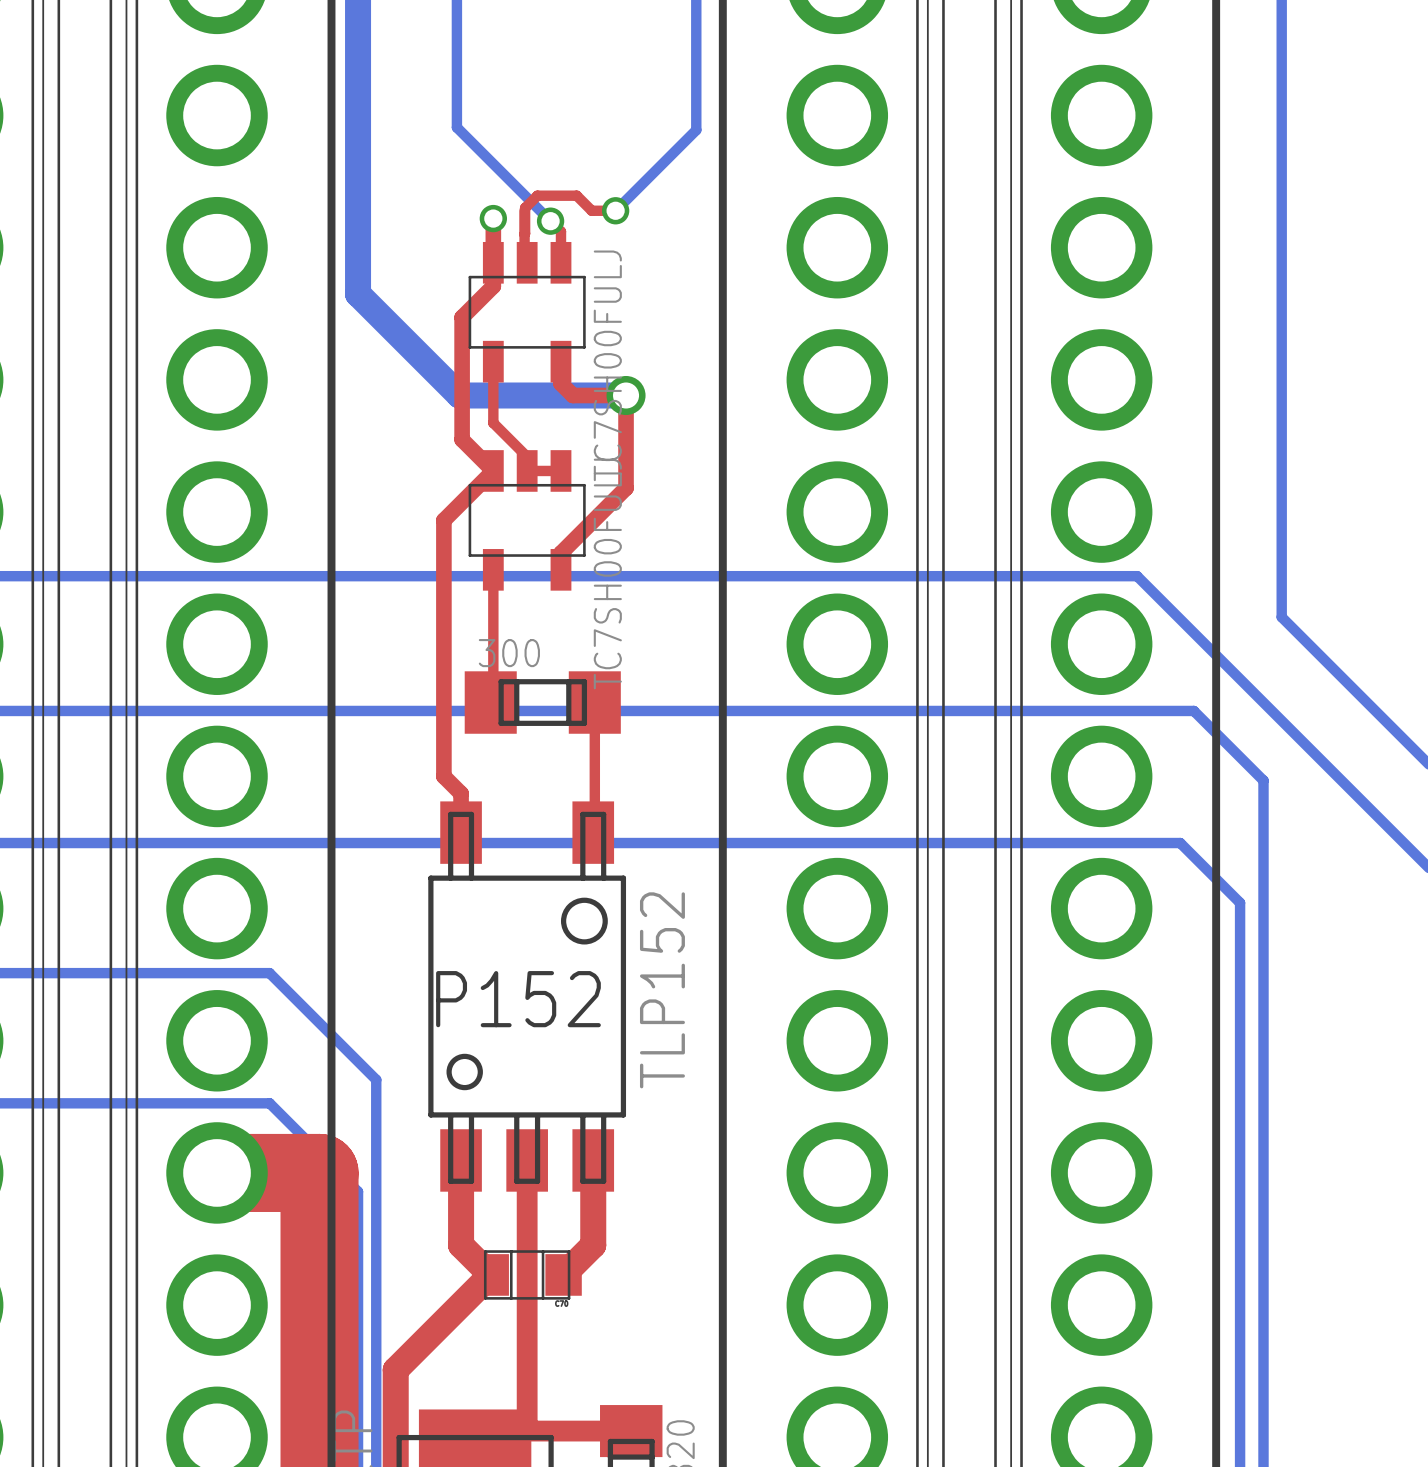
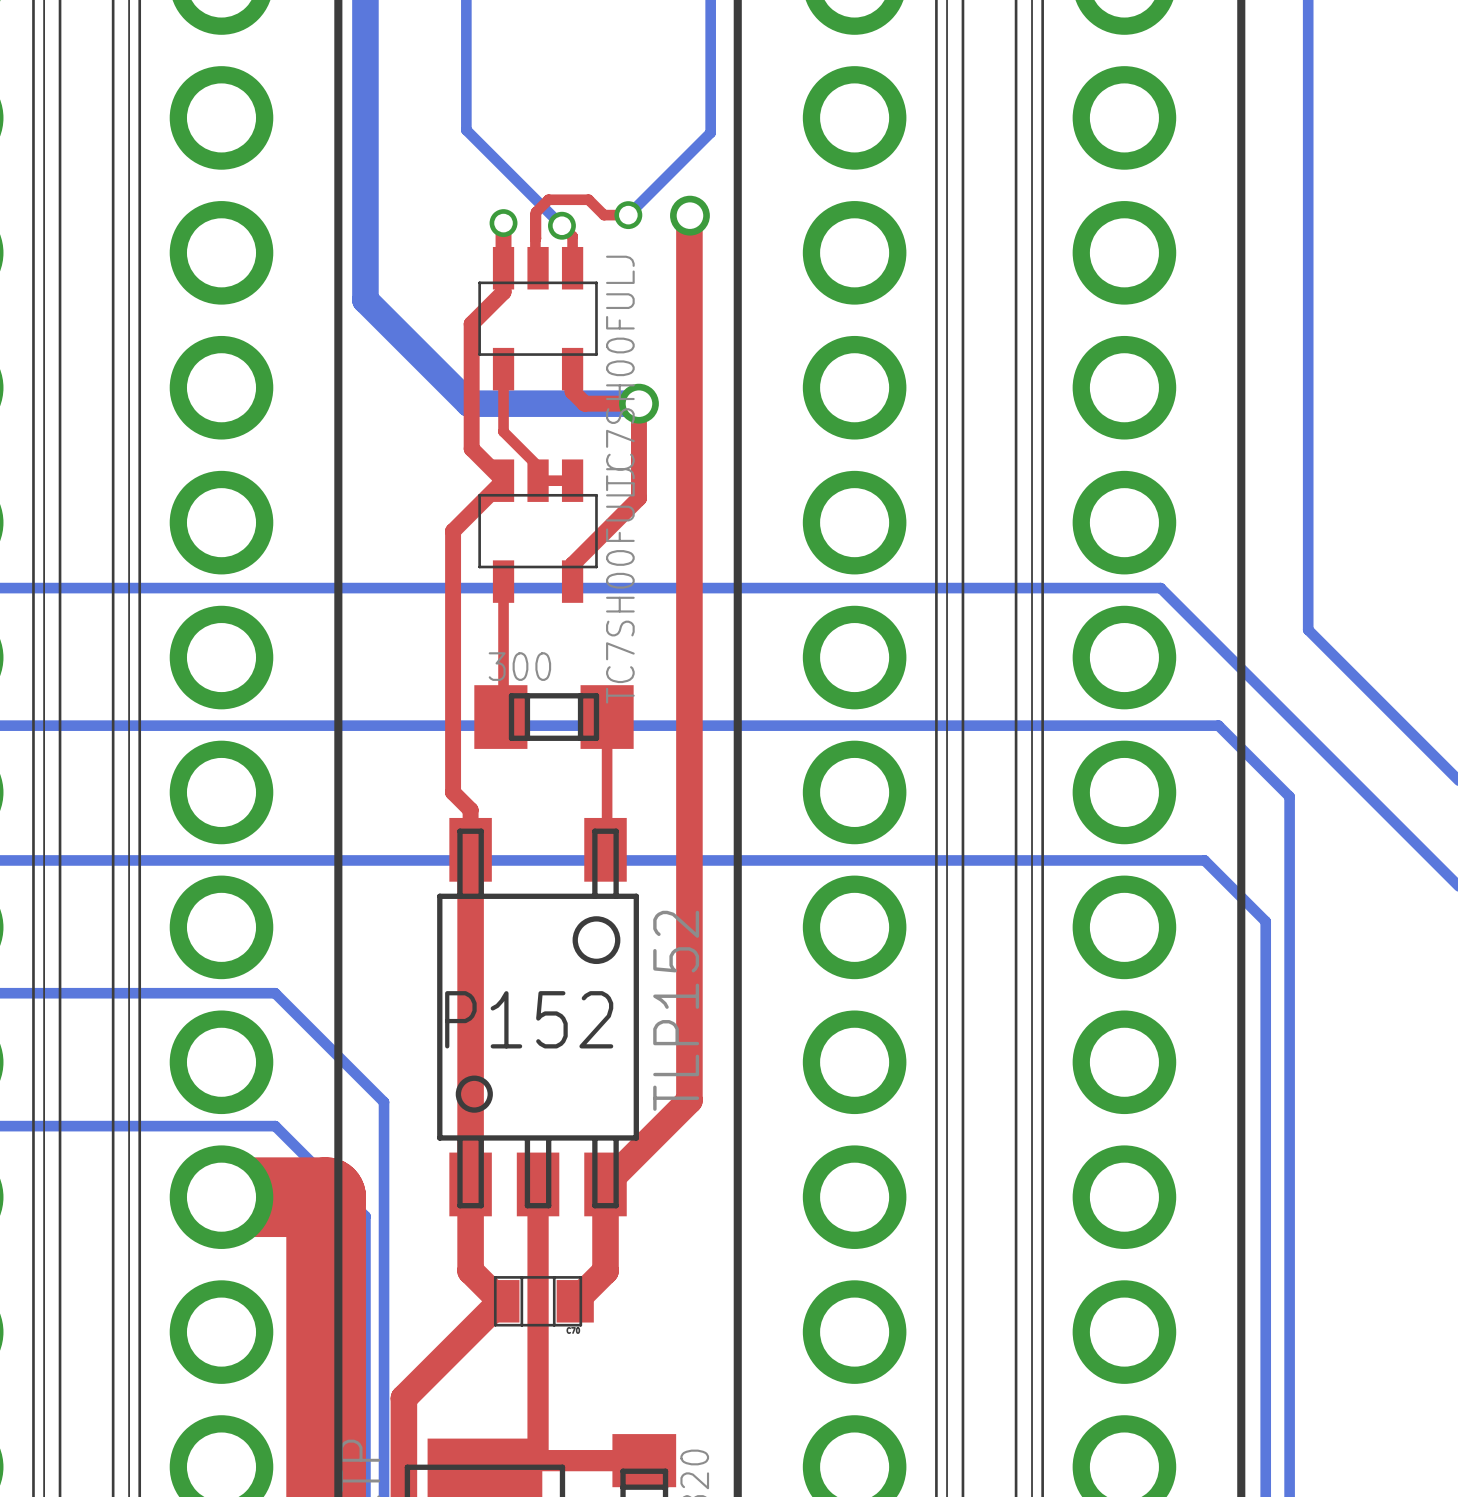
top track: none -> (689, 216) (689, 1100) (605, 1184)
via: none -> (689, 215)
top track: none -> (470, 849) (470, 1184)

